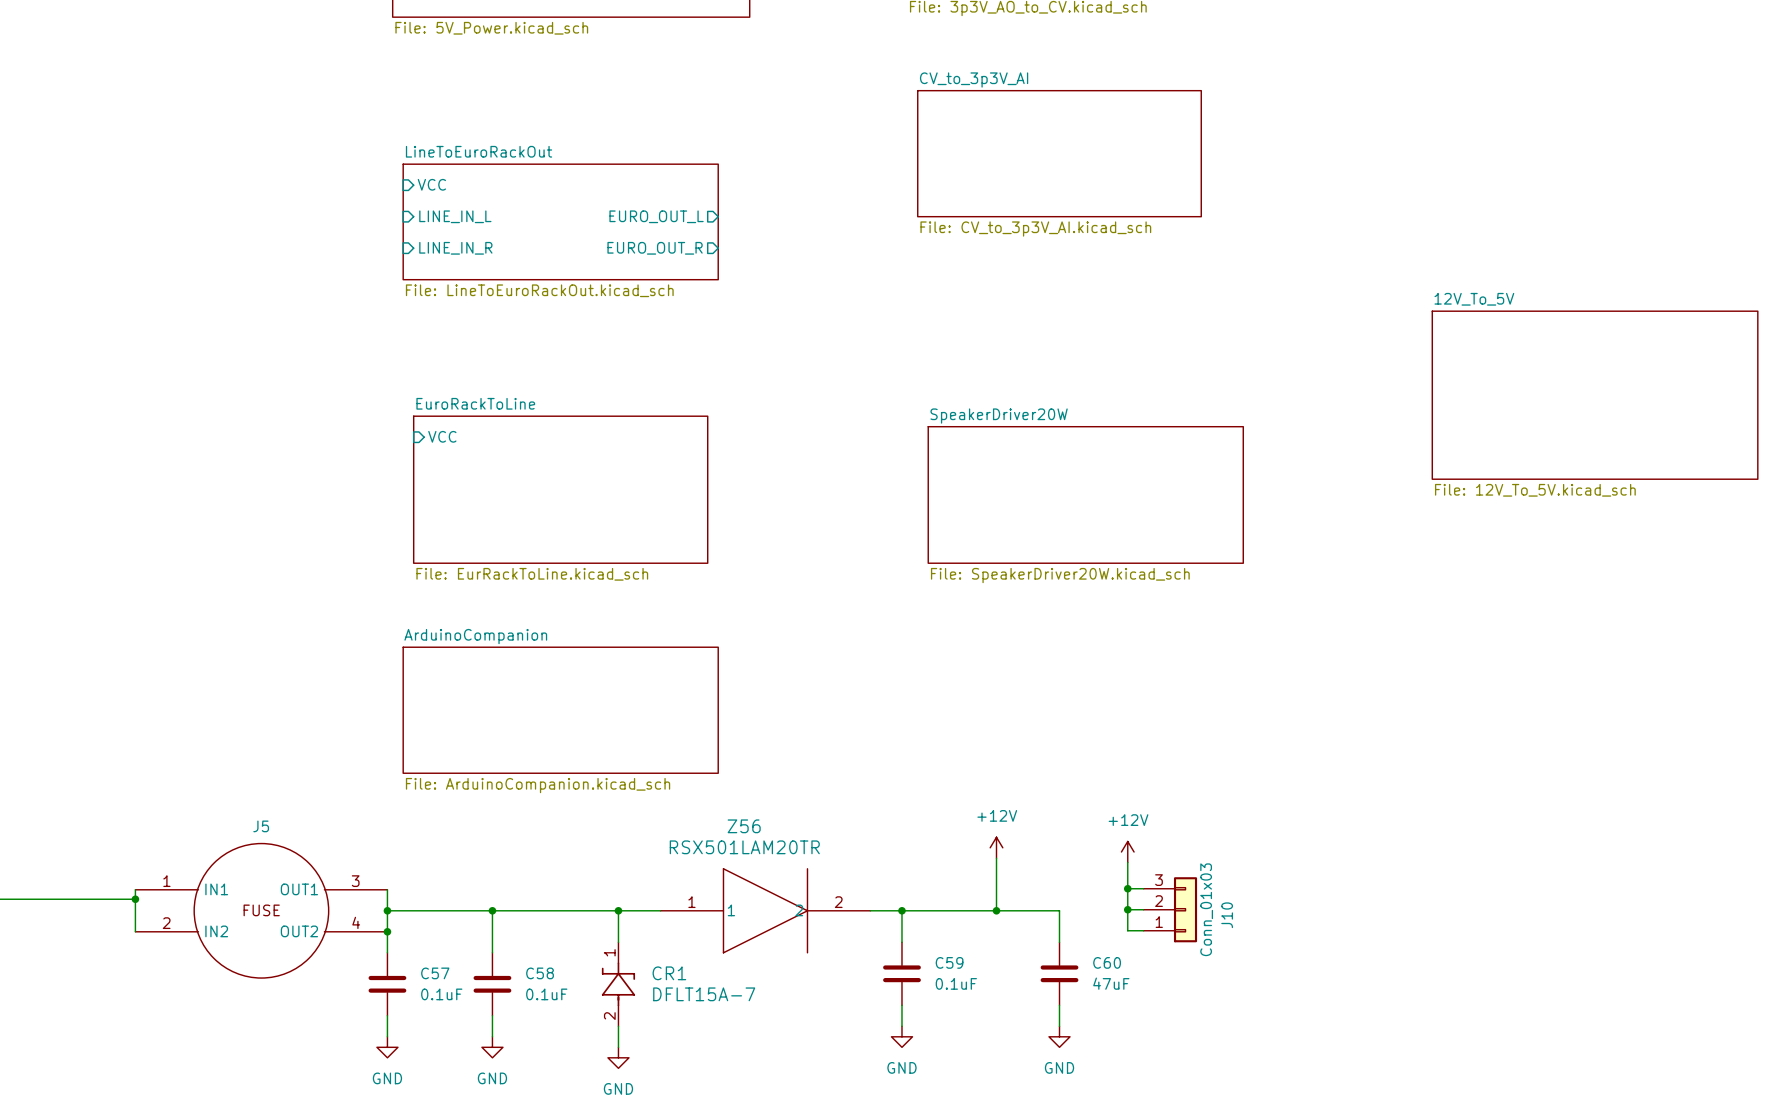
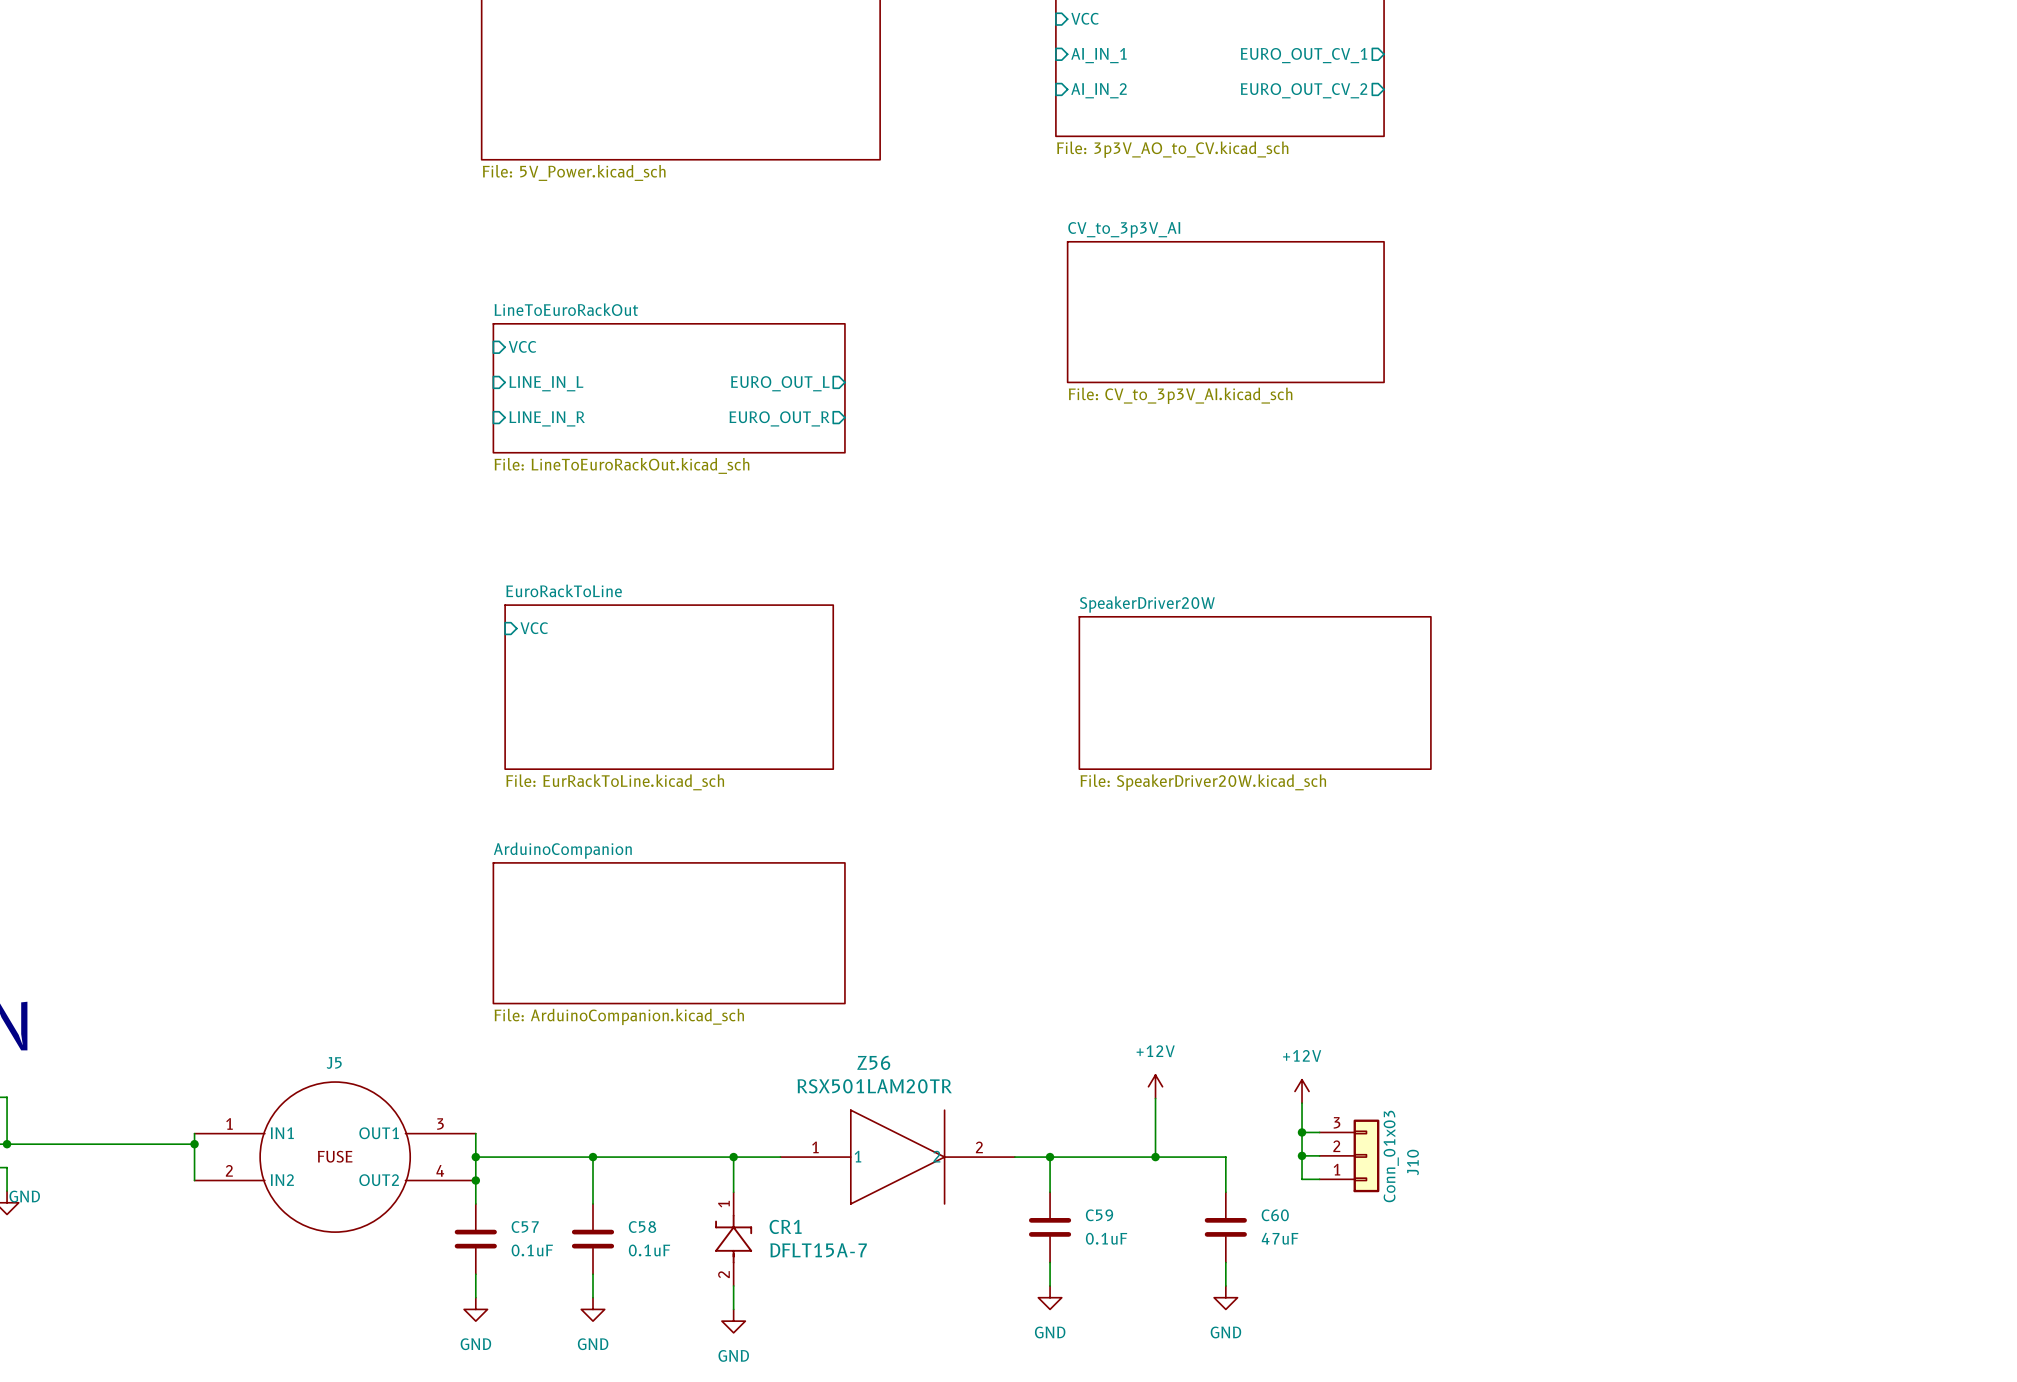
sheet 12V_To_5V: File: 12V_To_5V.kicad_sch (1595, 395) -> none

